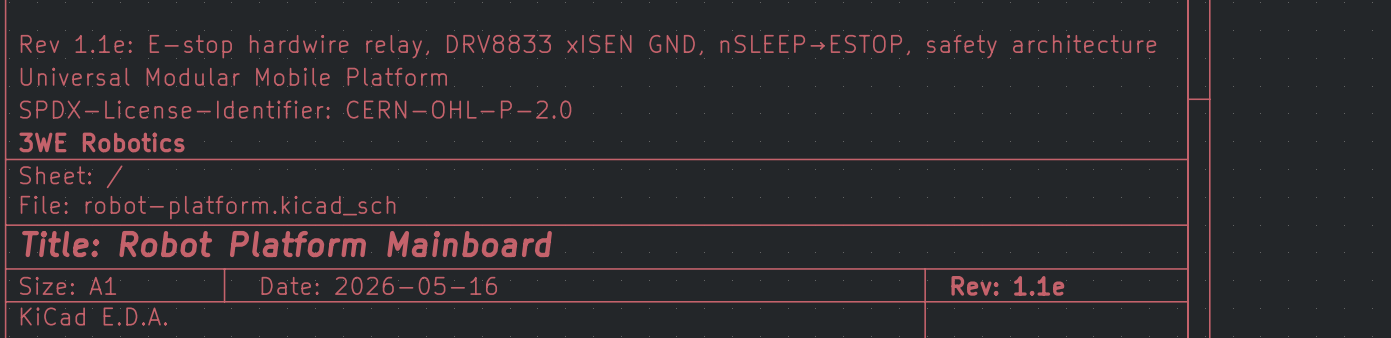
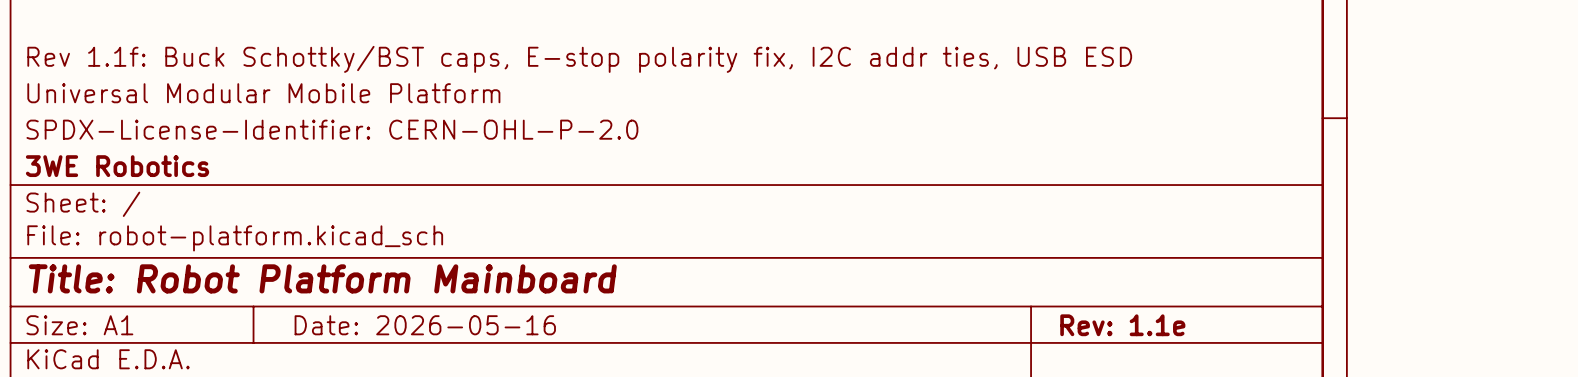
title block: Rev 1.1e: E-stop hardwire relay, DRV8833 xISEN GND, nSLEEP→ESTOP, safety architecture (588, 46) -> Rev 1.1f: Buck Schottky/BST caps, E-stop polarity fix, I2C addr ties, USB ESD (579, 59)

